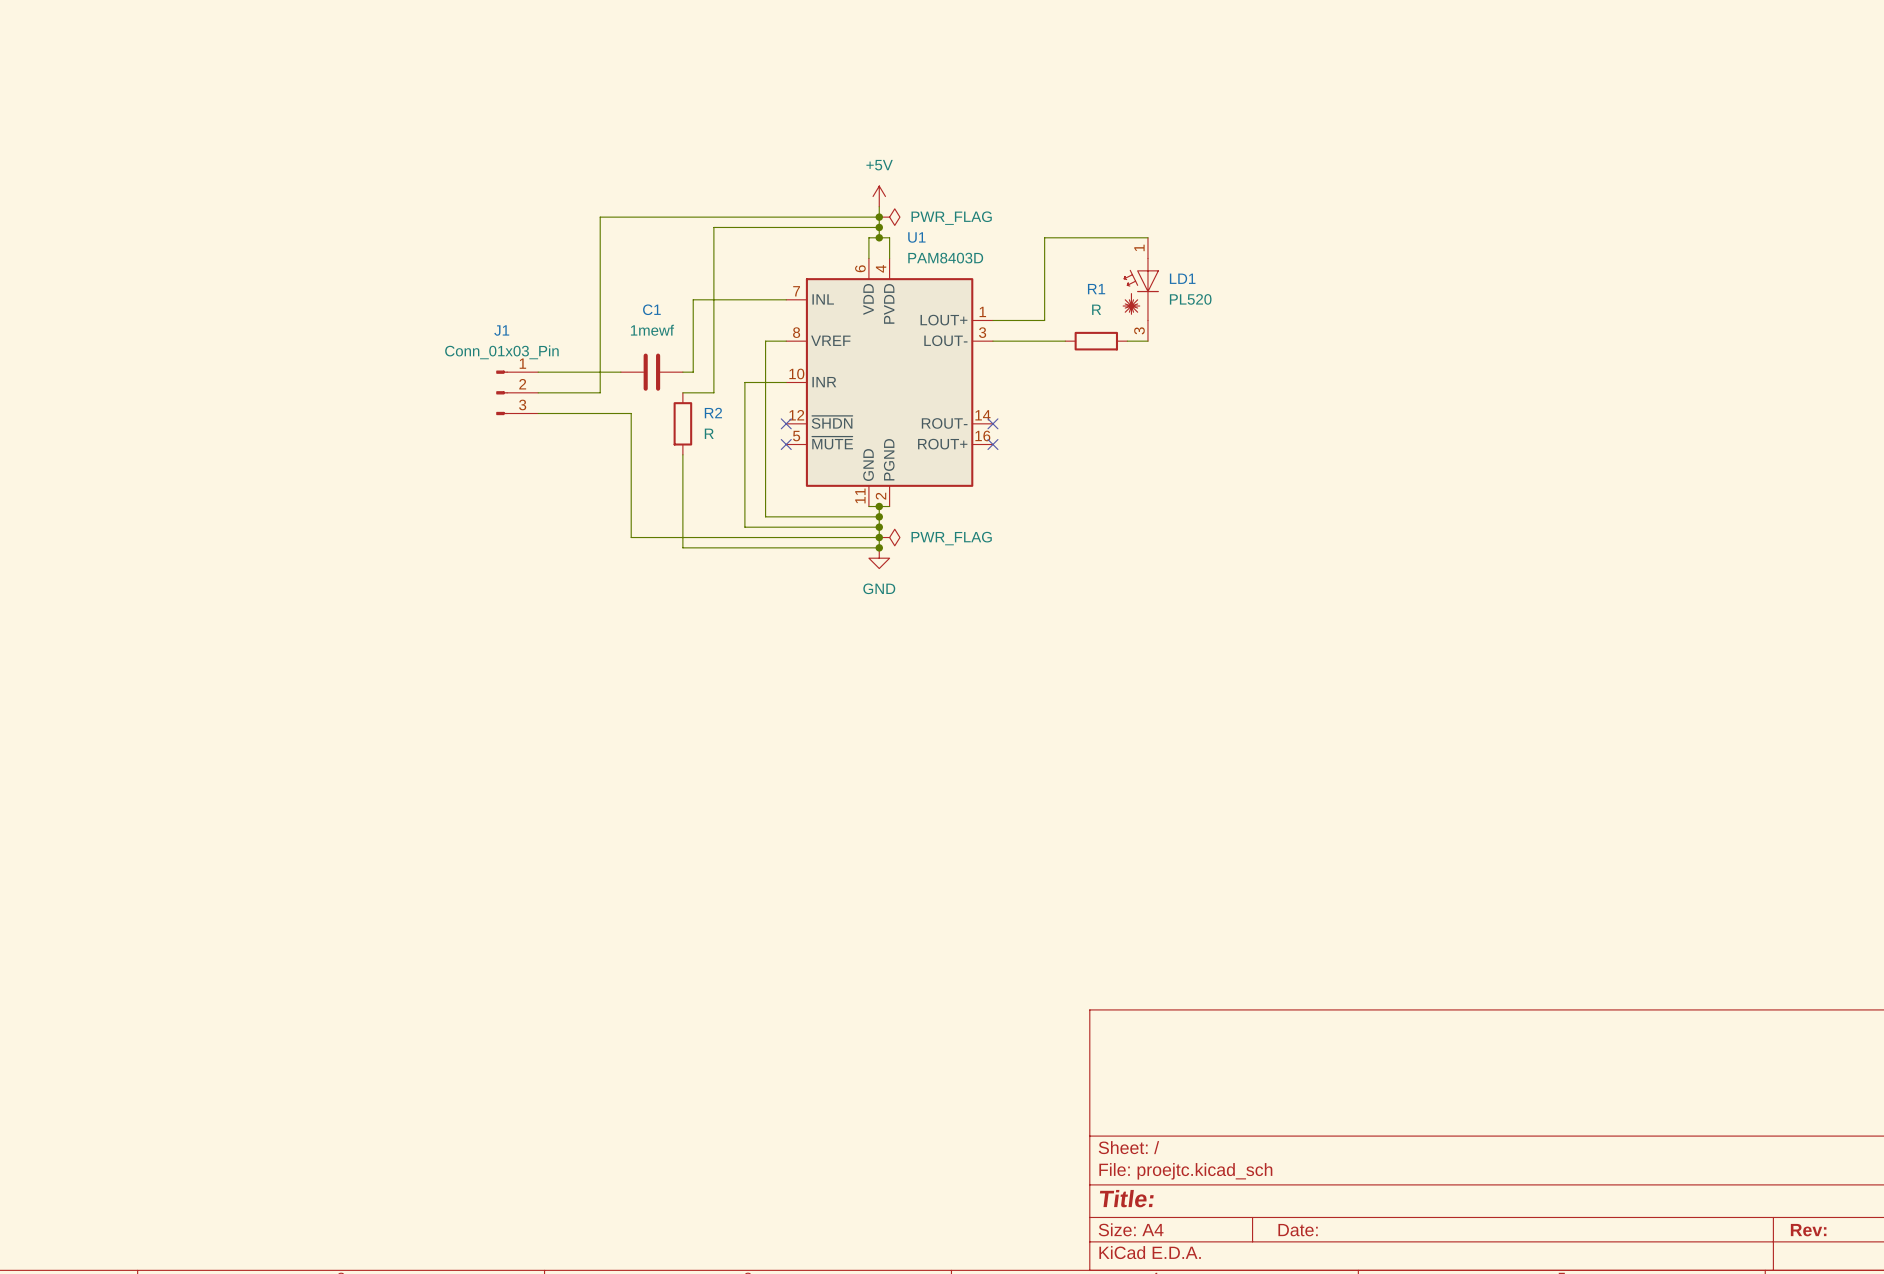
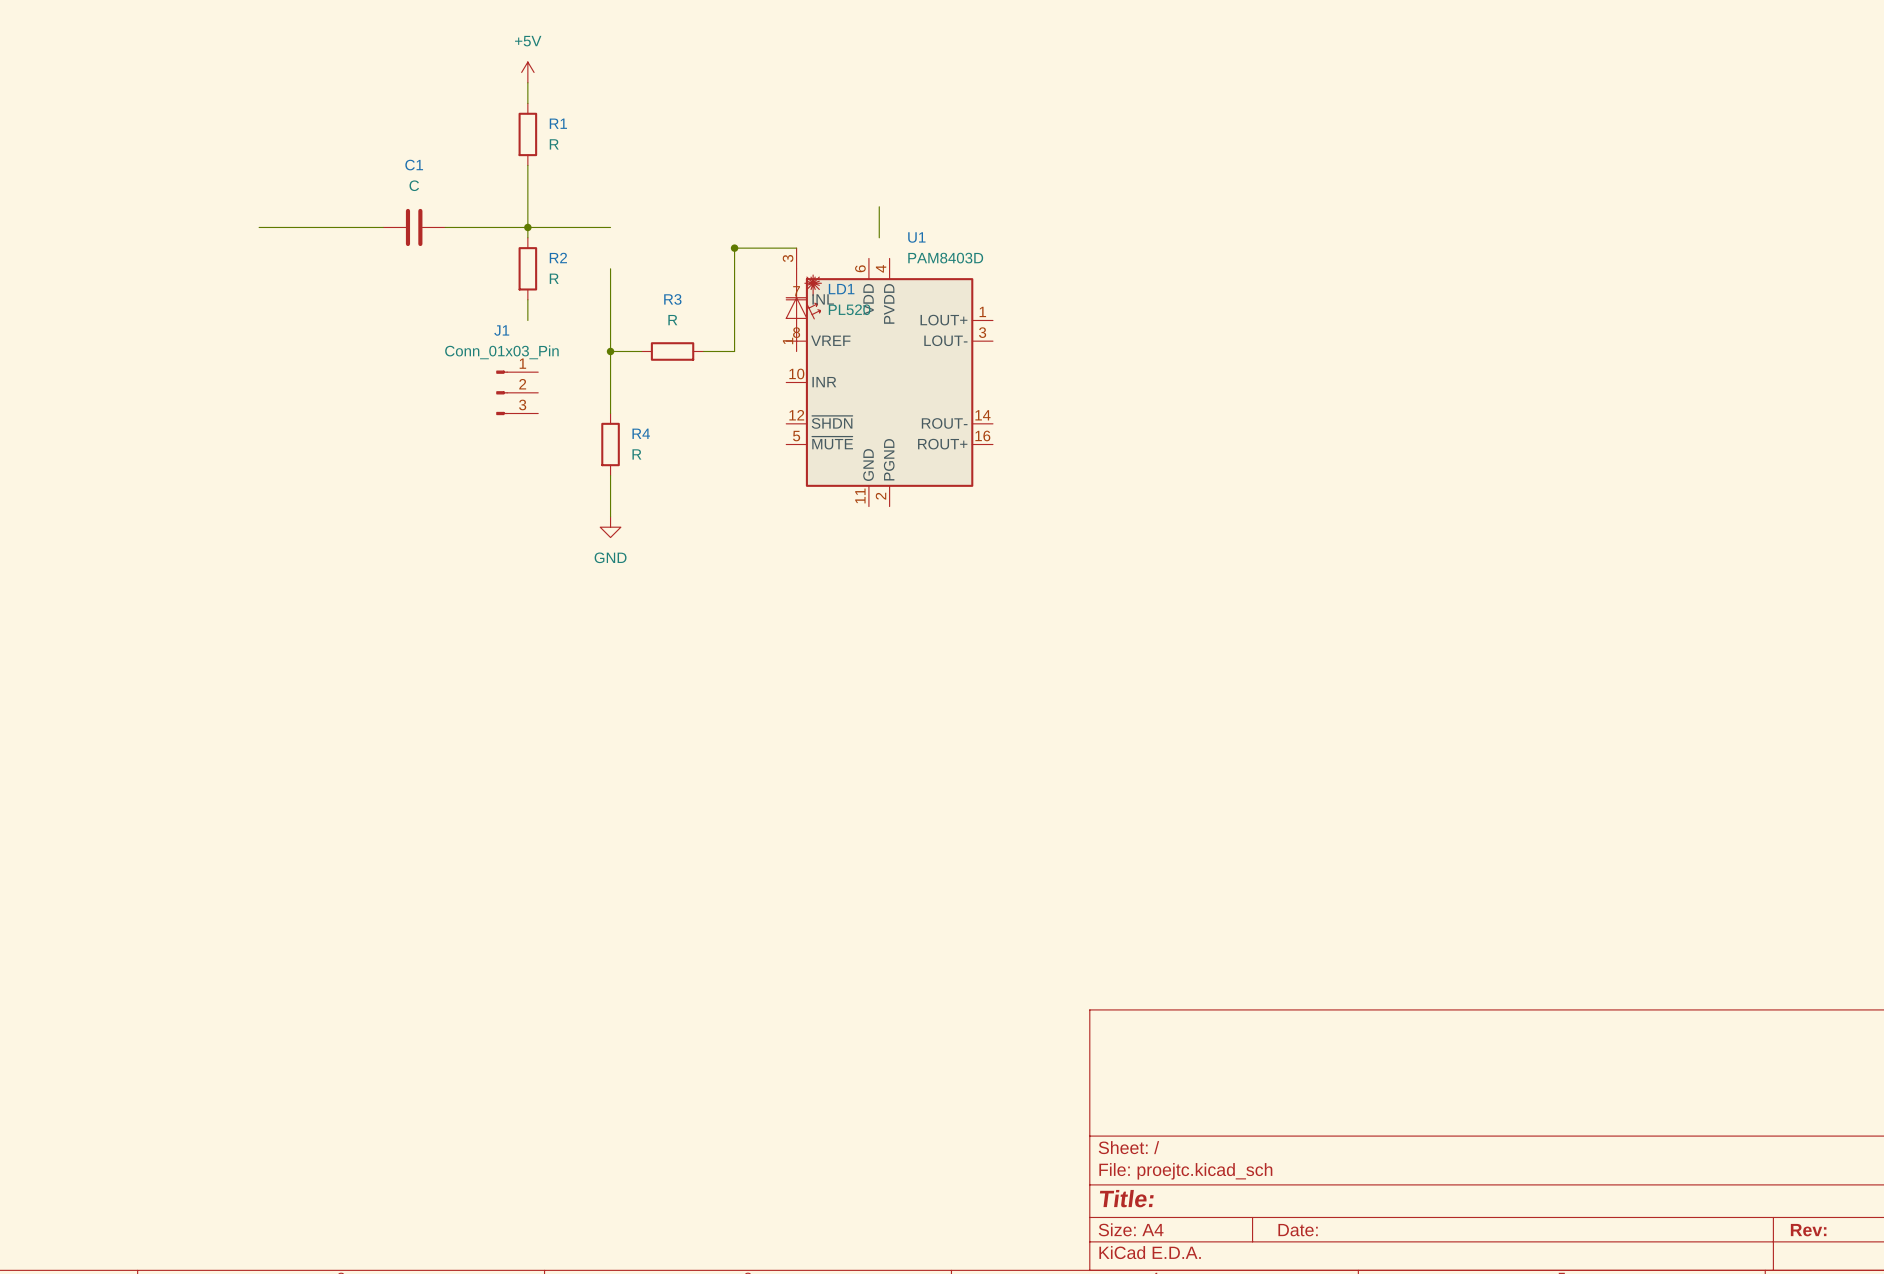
power symbol: none -> +5V (527, 72)
wire: none -> (527, 82) (527, 103)
wire: none -> (527, 165) (527, 237)
power symbol: +5V (879, 196) -> none
wire: (879, 217) (600, 217) (600, 392) (538, 392) -> none
junction: (879, 217) -> none
power symbol: PWR_FLAG (889, 217) -> none
wire: none -> (259, 227) (383, 227)
wire: none -> (445, 227) (610, 227)
junction: none -> (527, 227)
wire: (879, 227) (713, 227) (713, 392) (682, 392) -> none
junction: (879, 227) -> none
junction: (879, 237) -> none
wire: (1147, 237) (1044, 237) (1044, 320) (992, 320) -> none
junction: none -> (734, 248)
wire: none -> (796, 248) (734, 248) (734, 351) (703, 351)
wire: (868, 258) (868, 237) (889, 237) (889, 258) -> none
wire: none -> (610, 268) (610, 413)
R1 name position: R1 (1096, 289) -> R1 (558, 123)
LD1 rotation: 0° (1141, 289) -> 180° (803, 299)
LD1 position: (1141, 289) -> (803, 299)
wire: none -> (527, 299) (527, 320)
wire: (786, 299) (693, 299) (693, 372) (682, 372) -> none
C1 value: 1mewf (652, 330) -> C (414, 185)
wire: (786, 341) (765, 341) (765, 516) (879, 516) -> none
wire: (992, 341) (1065, 341) -> none
R1 rotation: 0° (1096, 341) -> 90° clockwise (527, 134)
R1 position: (1096, 341) -> (527, 134)
wire: (1127, 341) (1147, 341) -> none
wire: none -> (610, 351) (641, 351)
junction: none -> (610, 351)
R3: none -> R (672, 351)
wire: (538, 372) (620, 372) -> none
C1 position: (651, 372) -> (414, 227)
wire: (786, 382) (744, 382) (744, 527) (879, 527) -> none
wire: (538, 413) (631, 413) (631, 537) (879, 537) -> none
R2 position: (682, 423) -> (527, 268)
no-connect mark: (786, 423) -> none
no-connect mark: (992, 423) -> none
R4: none -> R (610, 444)
no-connect mark: (786, 444) -> none
no-connect mark: (992, 444) -> none
wire: (682, 454) (682, 547) (879, 547) (879, 506) -> none
wire: none -> (610, 475) (610, 516)
wire: (868, 506) (889, 506) -> none
junction: (879, 506) -> none
junction: (879, 516) -> none
power symbol: none -> GND (610, 527)
junction: (879, 527) -> none
junction: (879, 537) -> none
power symbol: PWR_FLAG (889, 537) -> none
junction: (879, 547) -> none
power symbol: GND (879, 558) -> none

